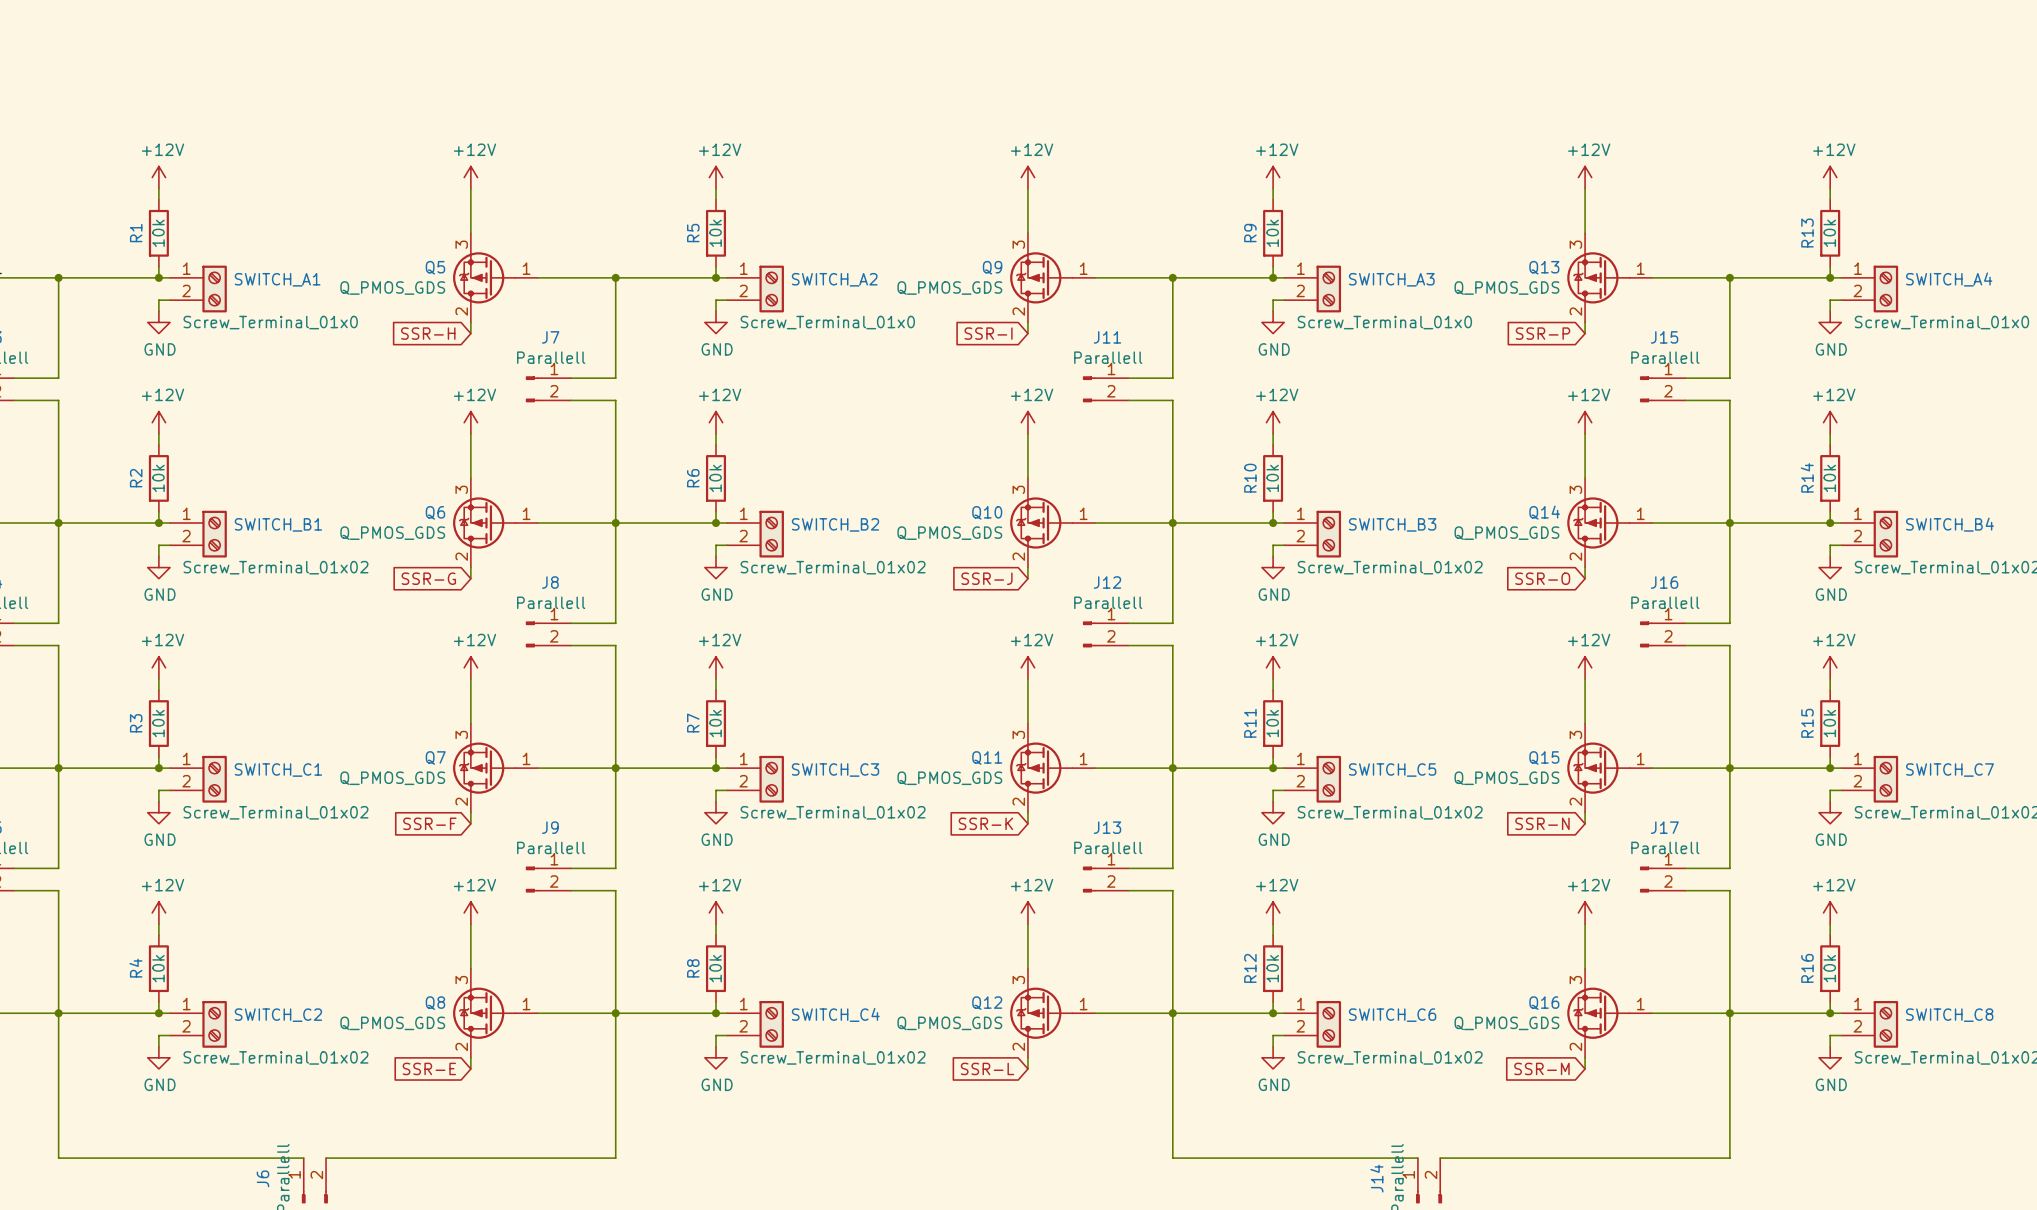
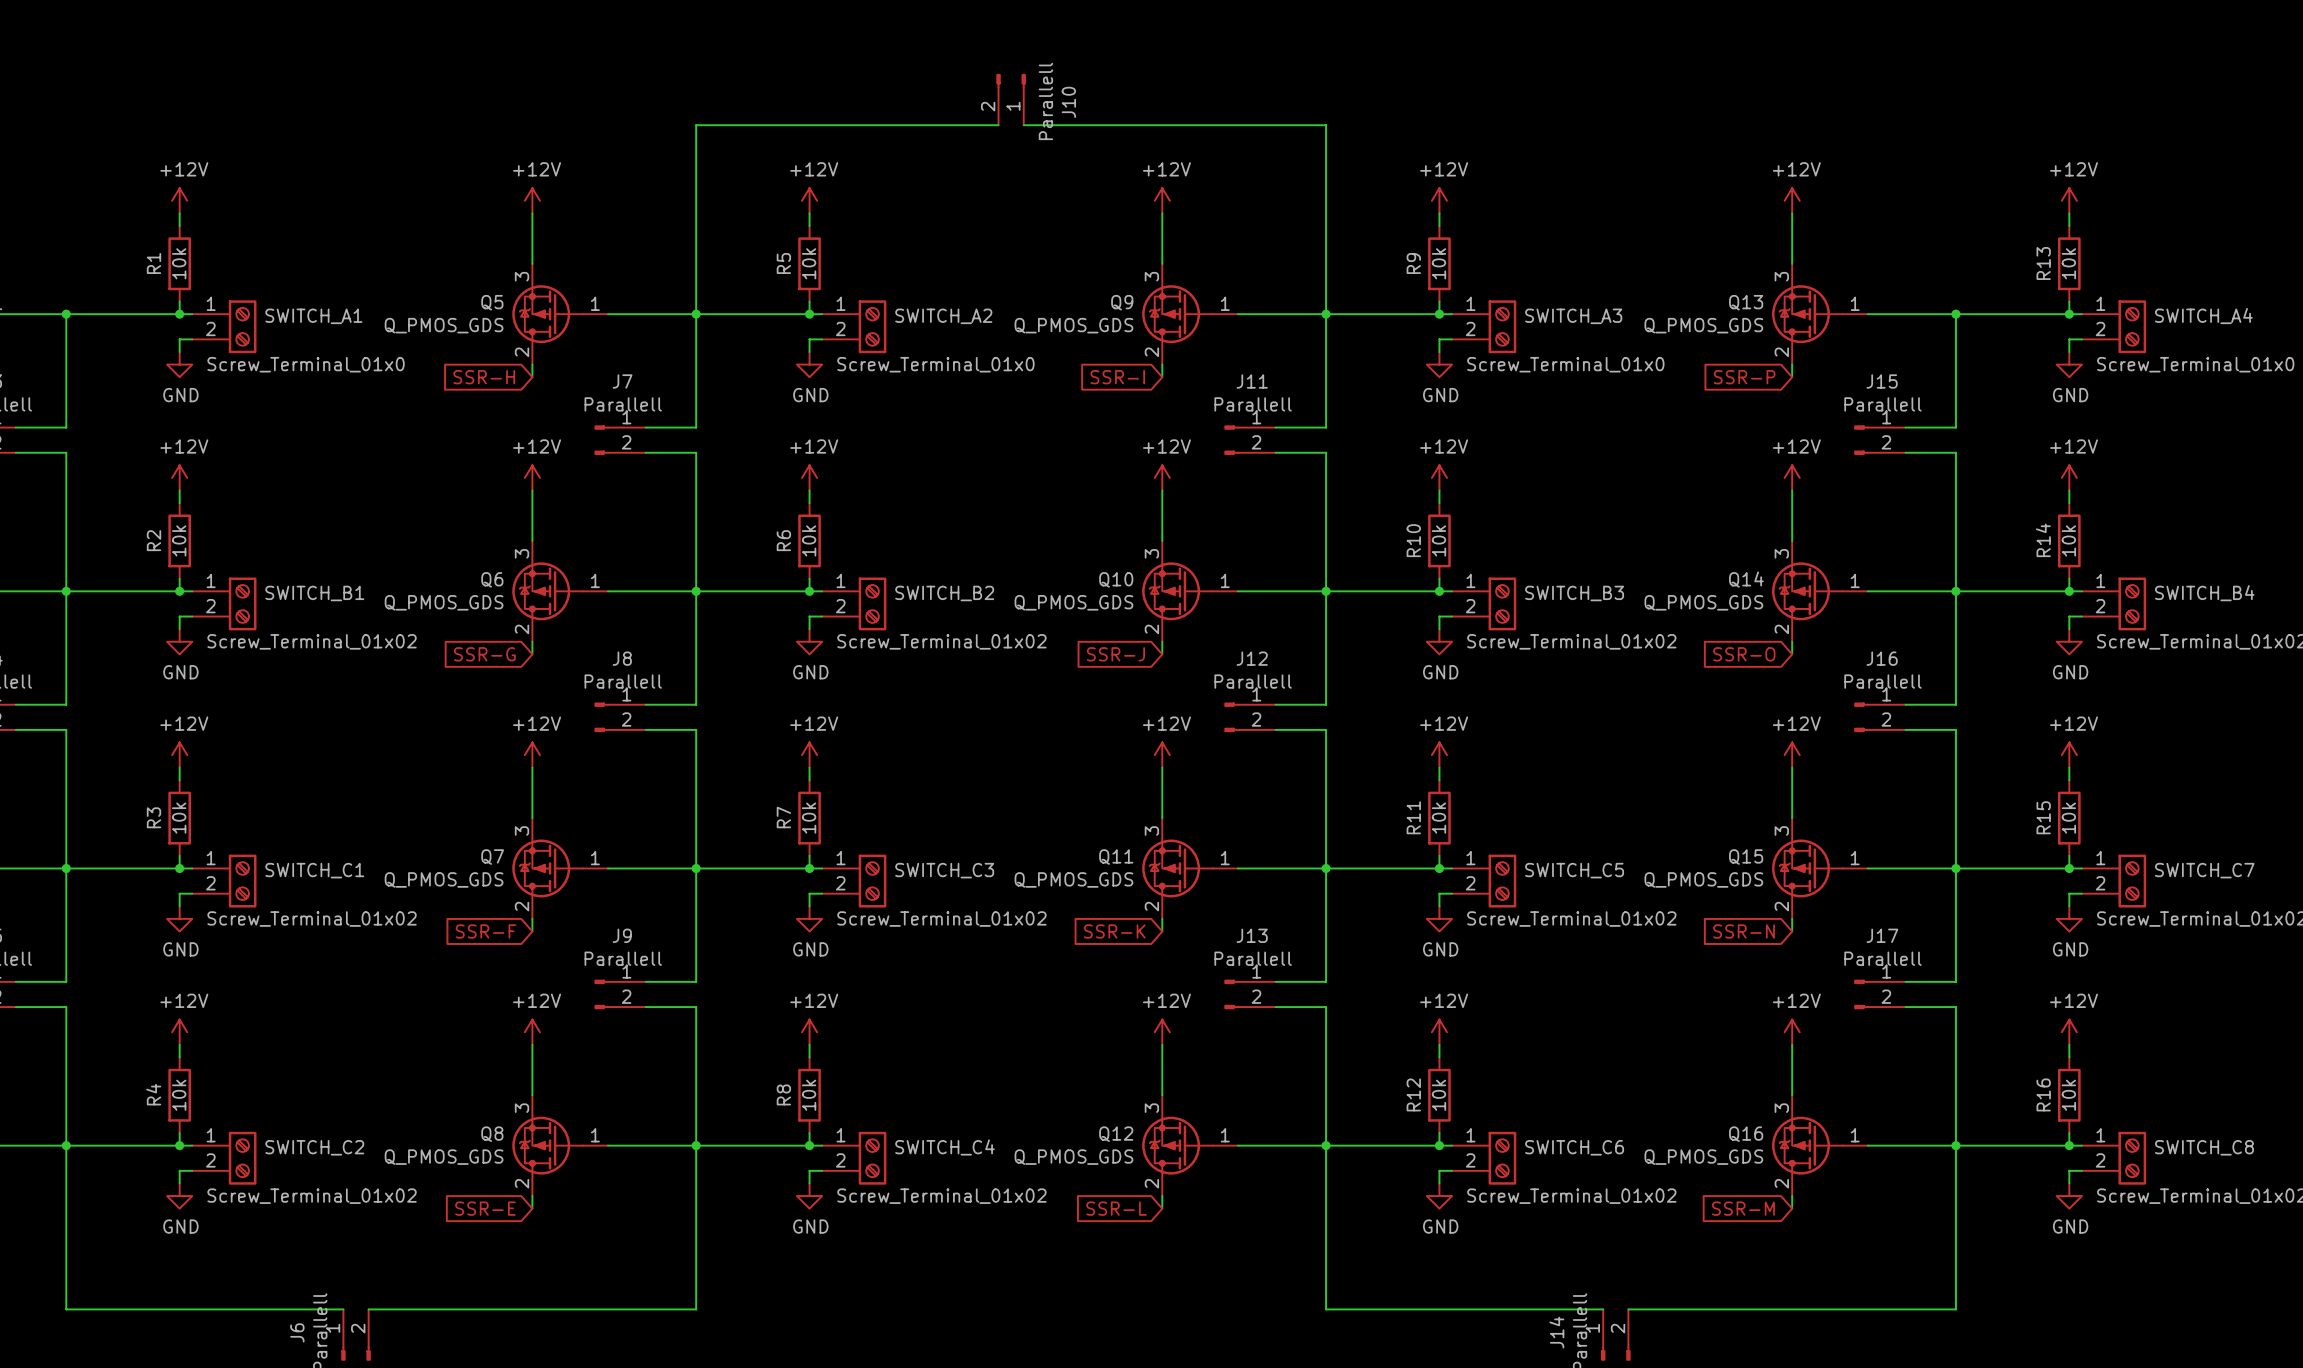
J10: none -> Parallell (1011, 99)
wire: none -> (998, 125) (696, 125) (696, 314)
wire: none -> (1023, 125) (1326, 125) (1326, 314)

